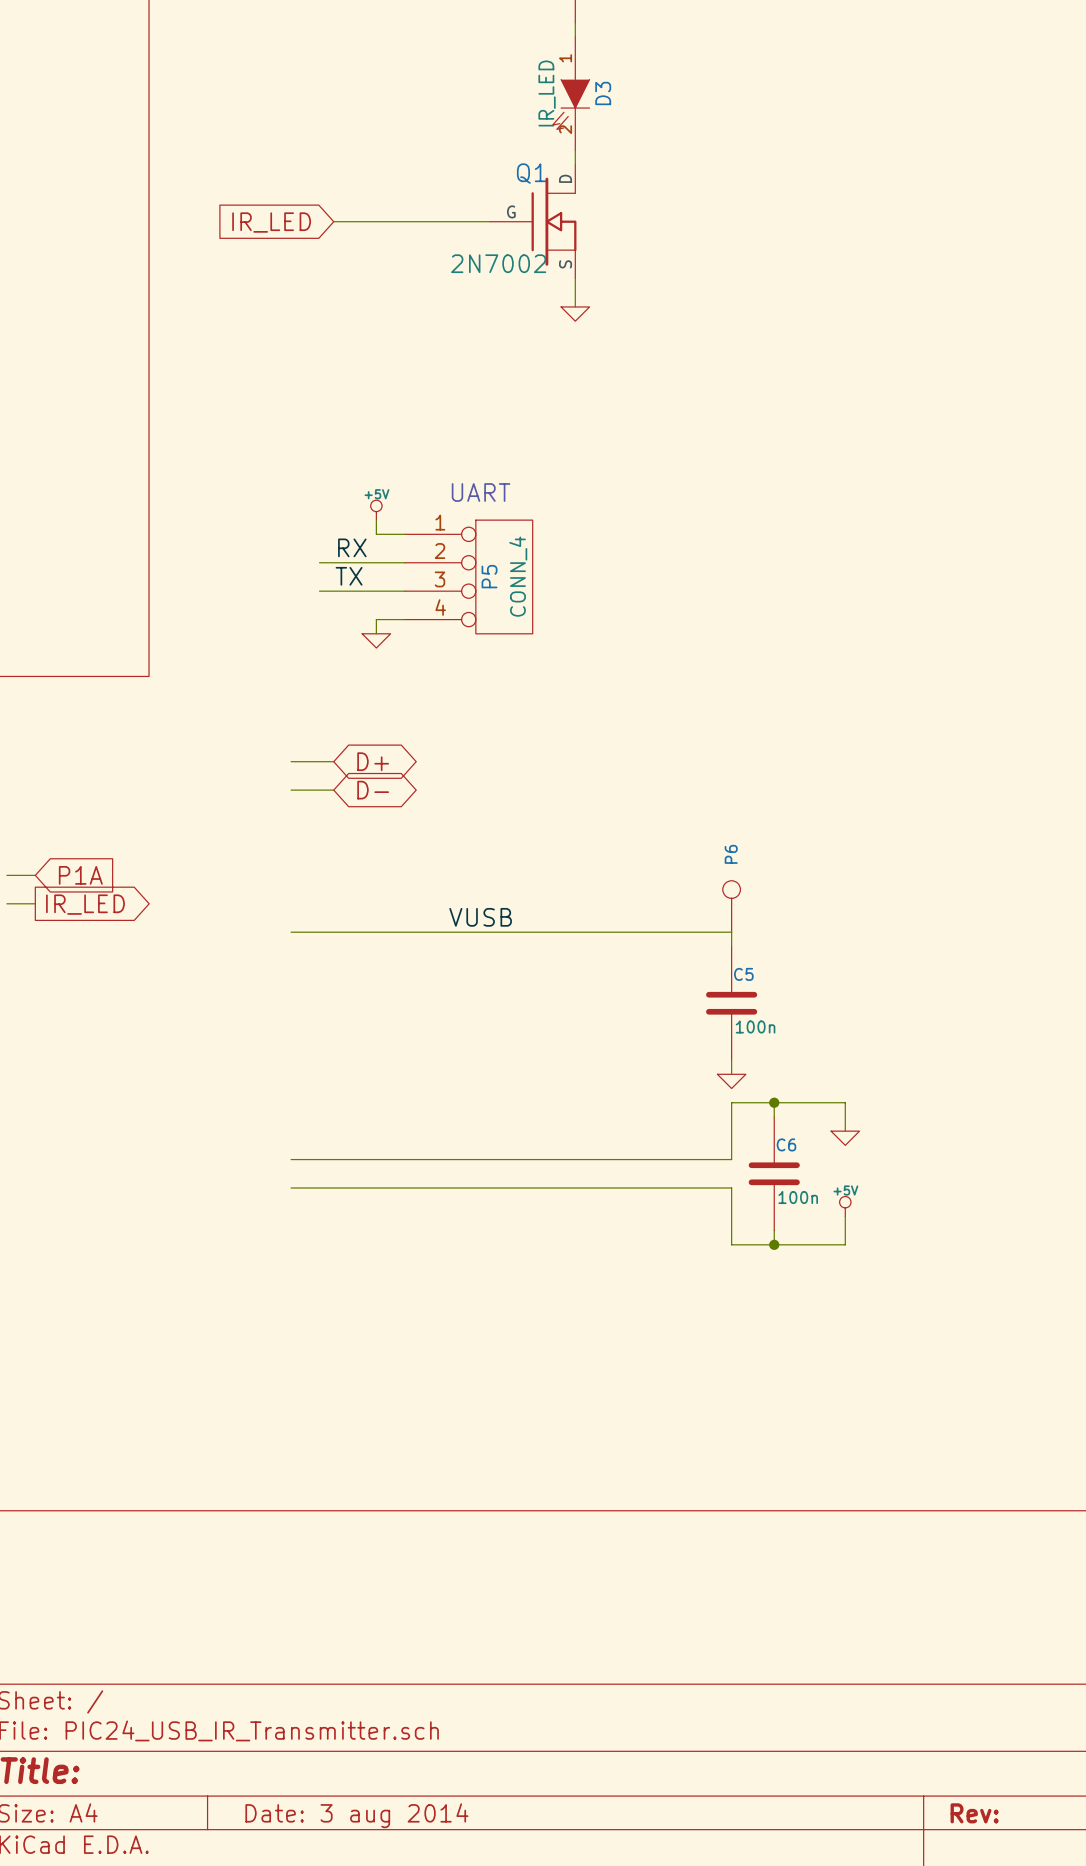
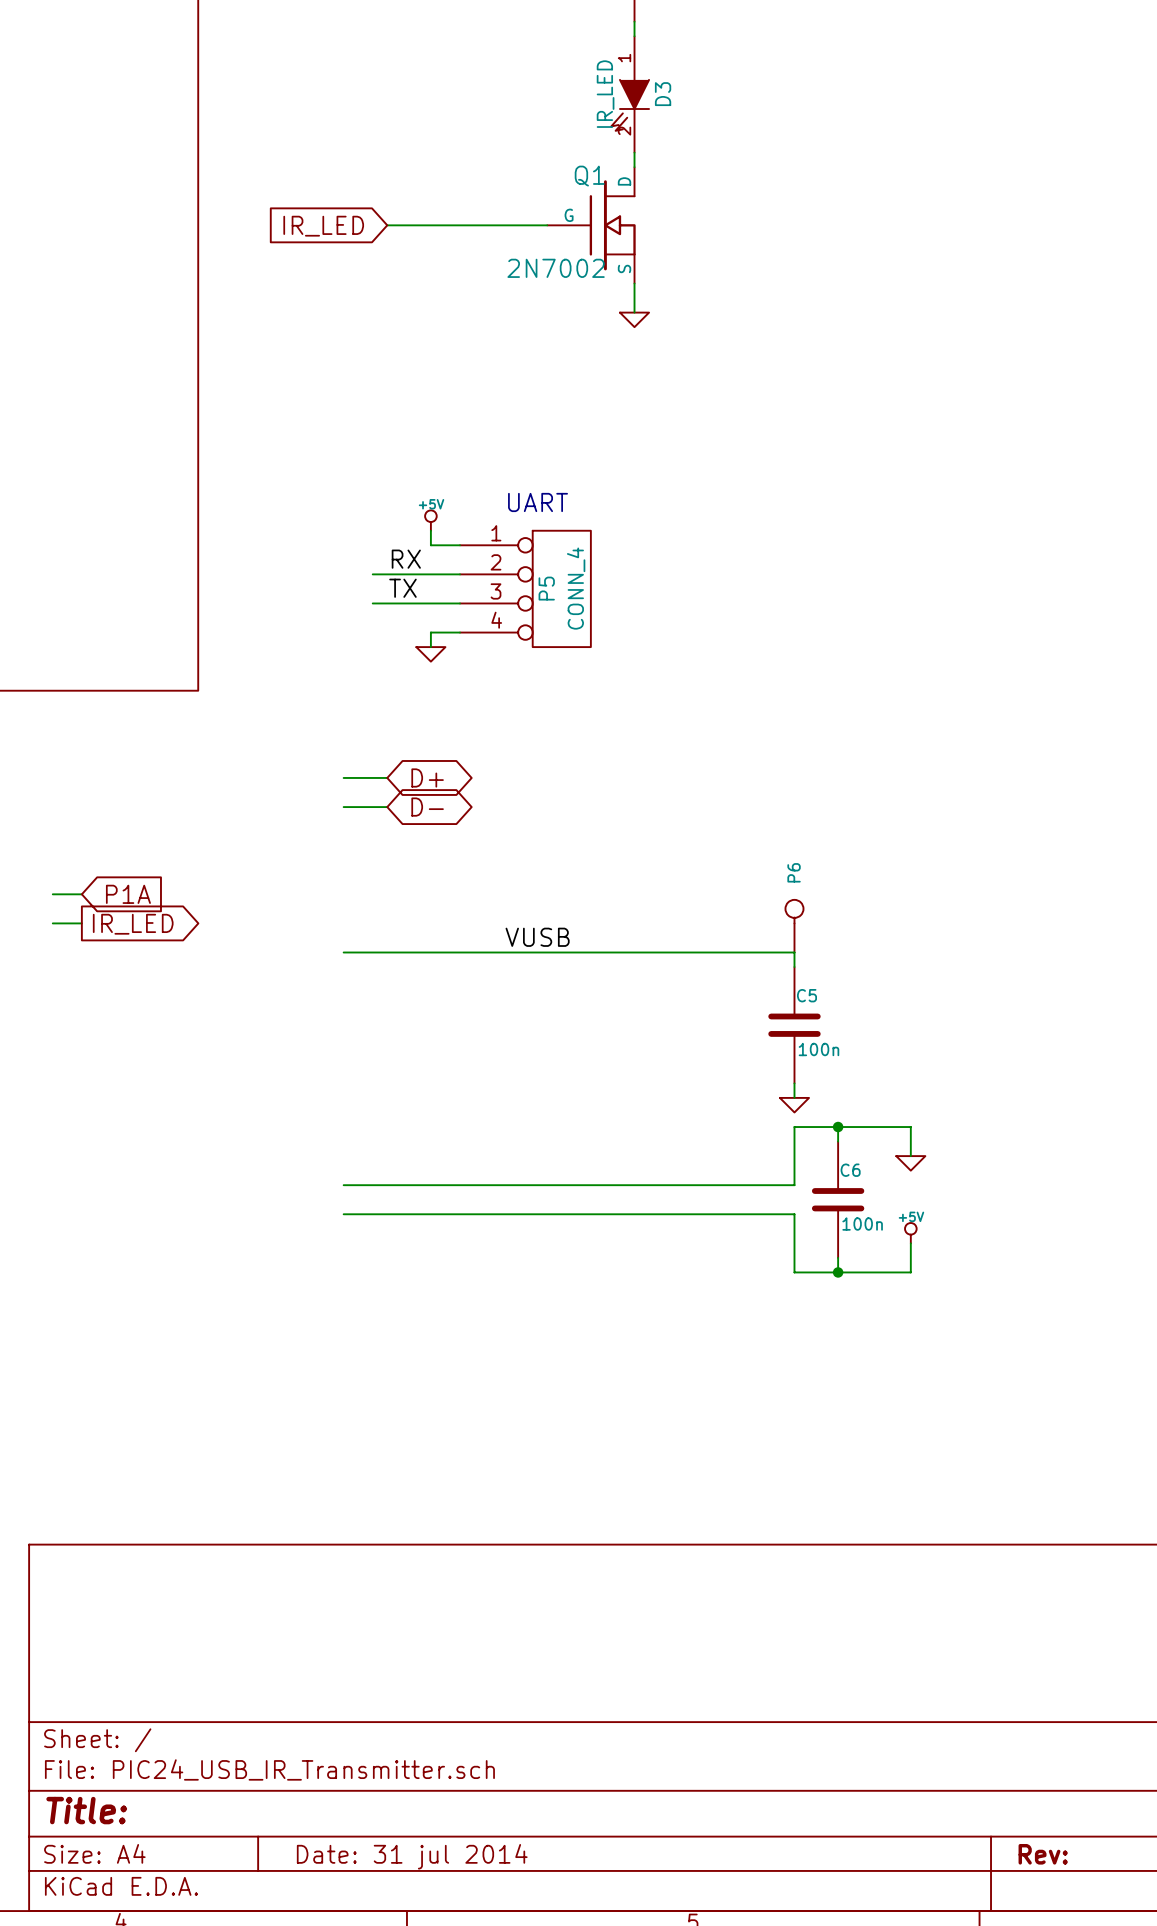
title block: Date: 3 aug 2014 (356, 1815) -> Date: 31 jul 2014 (412, 1856)

